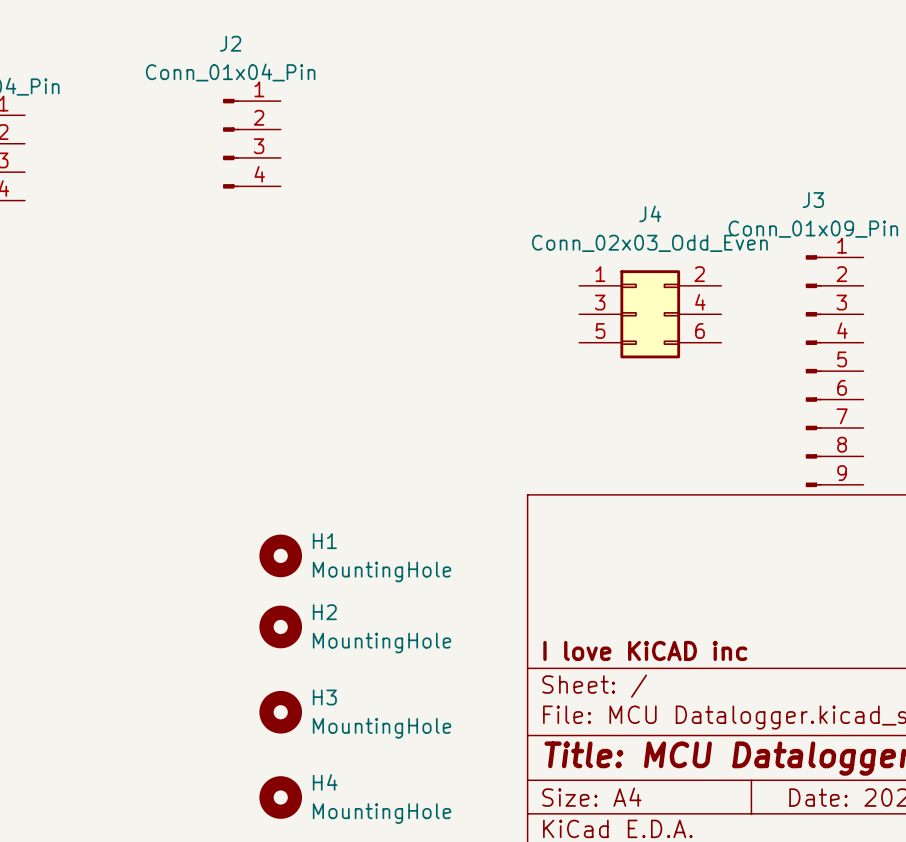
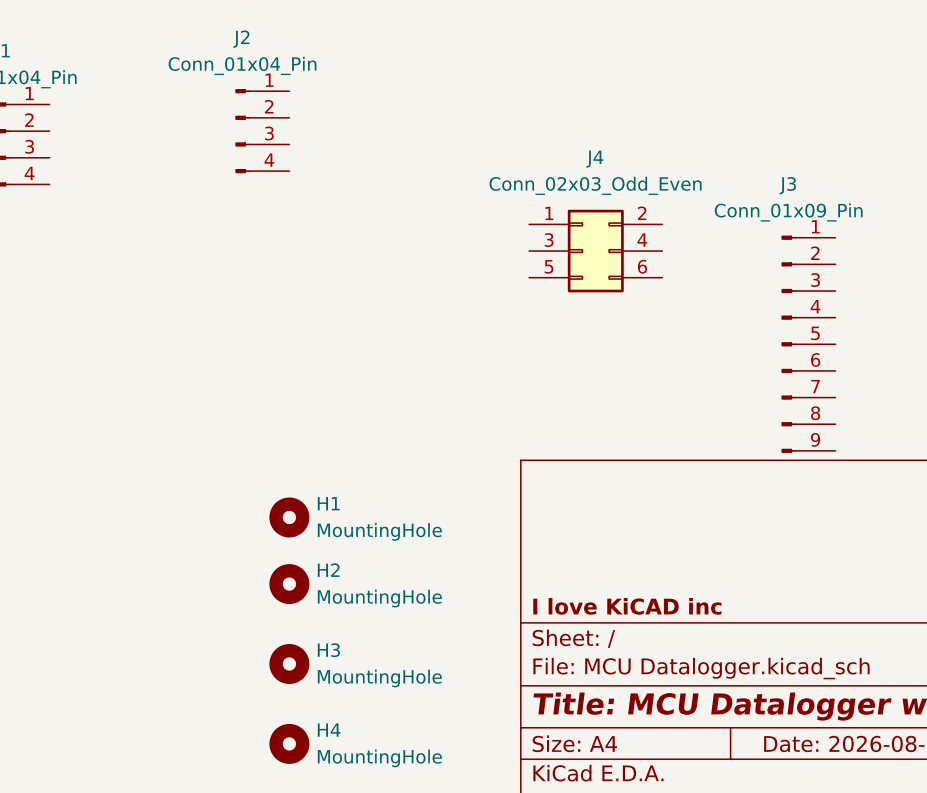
J4 position: (650, 314) -> (595, 251)

